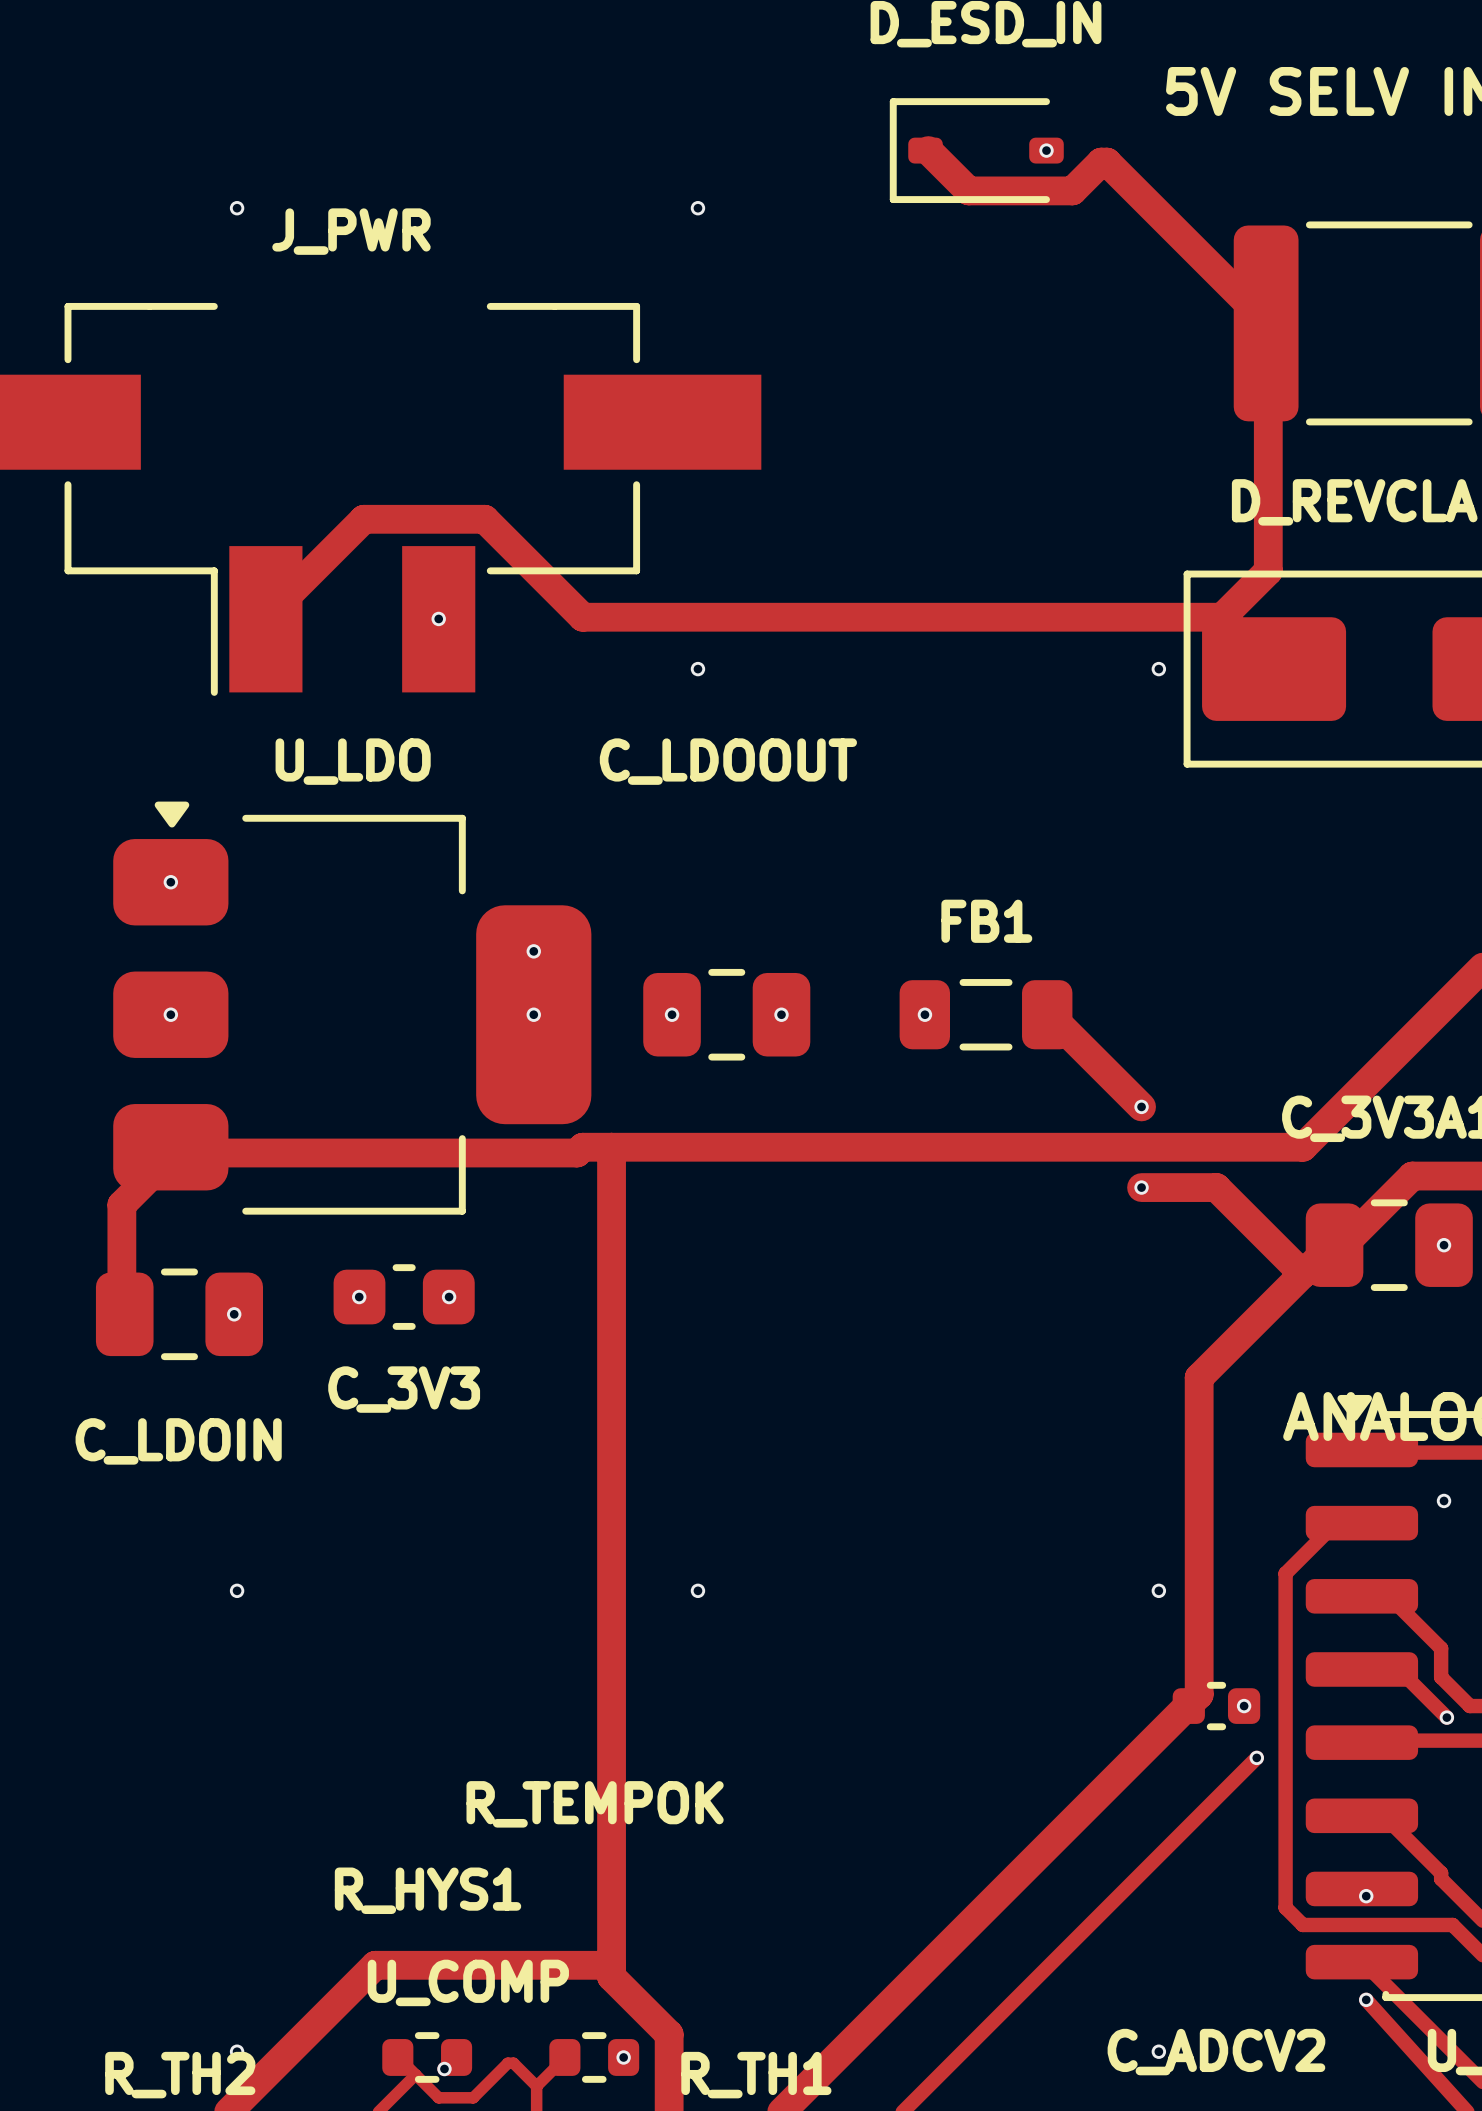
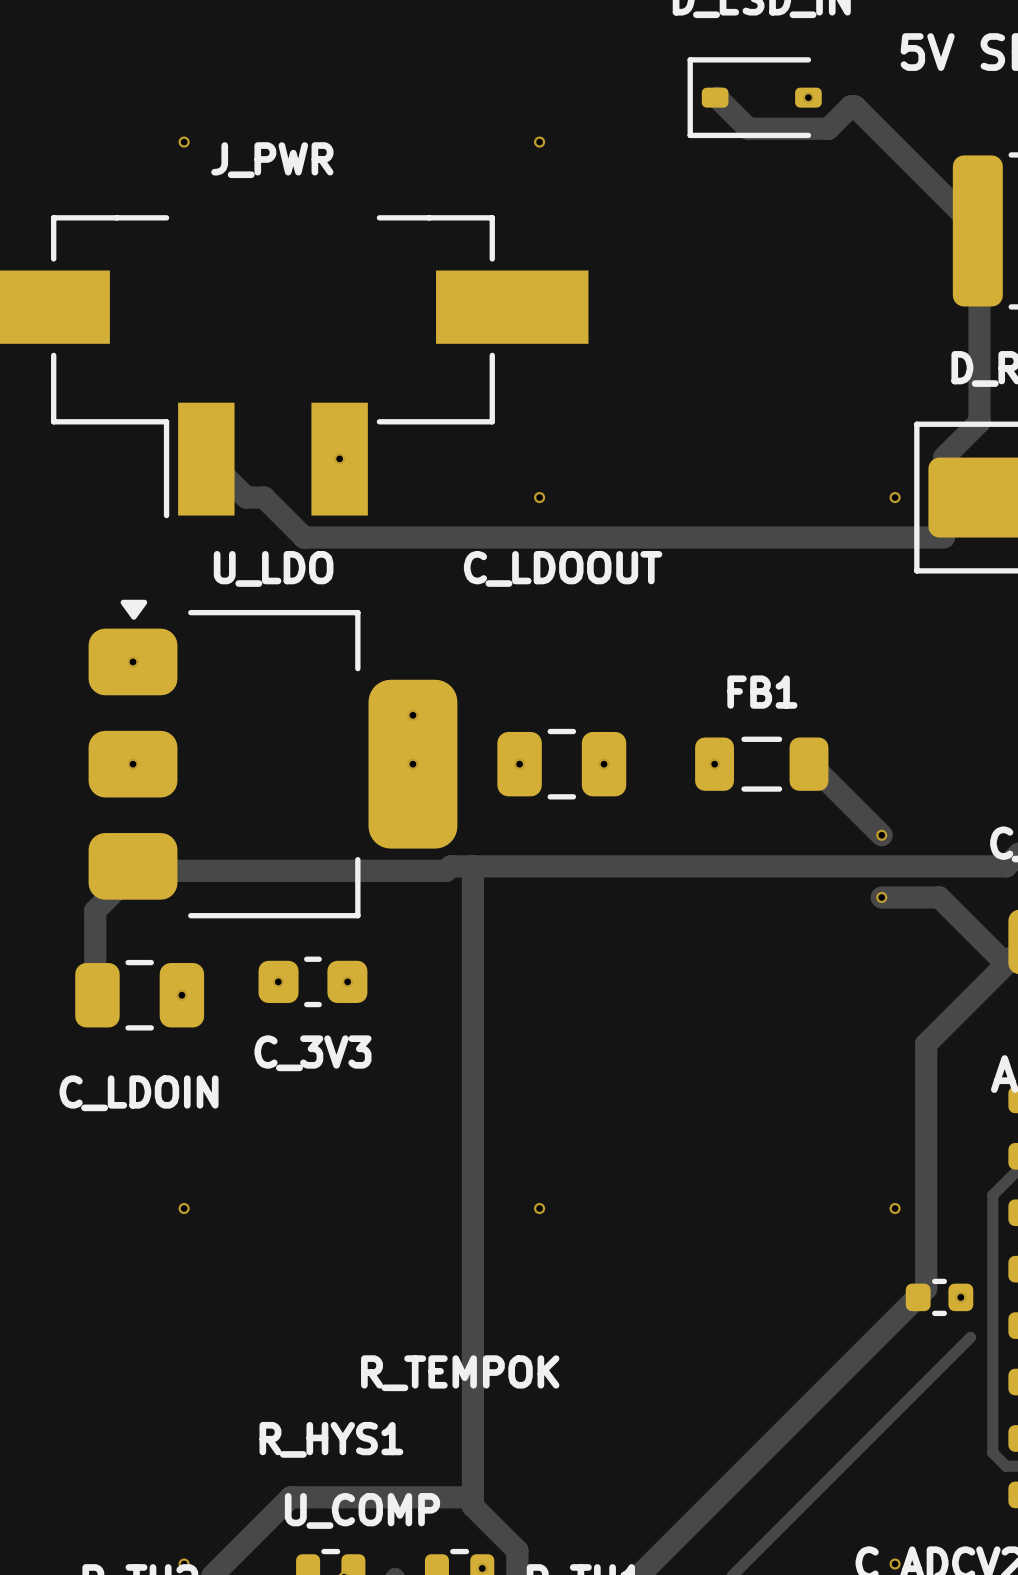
track: (265, 617) (363, 519) (484, 519) (582, 617) (1222, 617) (1268, 663) -> (206, 457) (246, 497) (264, 497) (304, 537) (943, 537)
via: (1256, 1757) -> none

